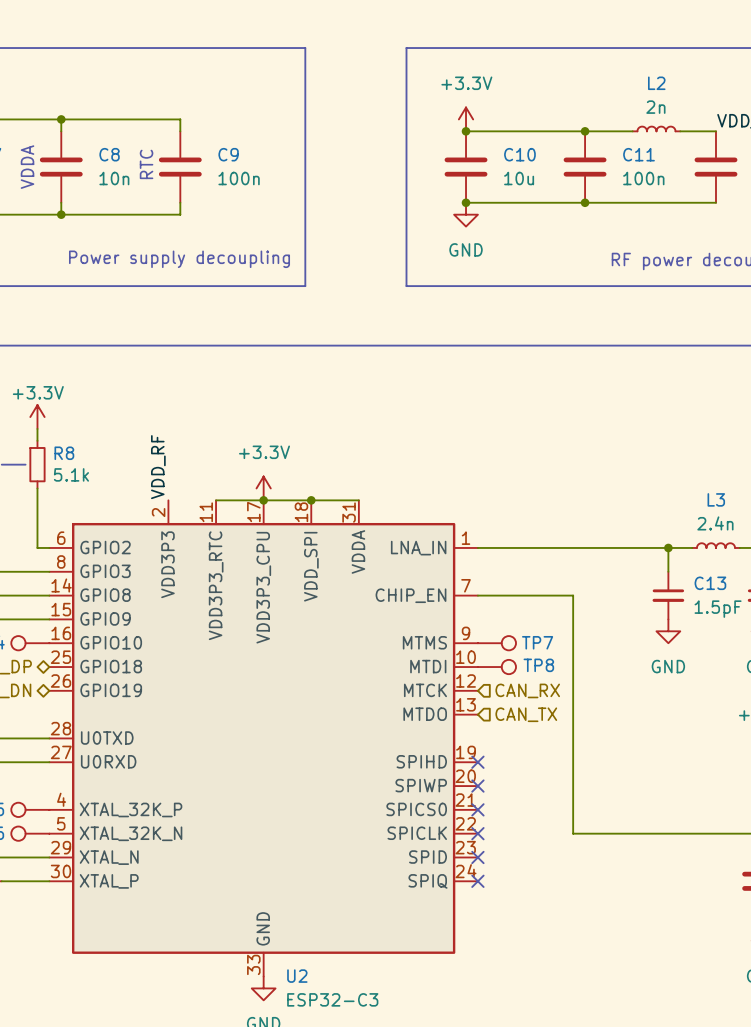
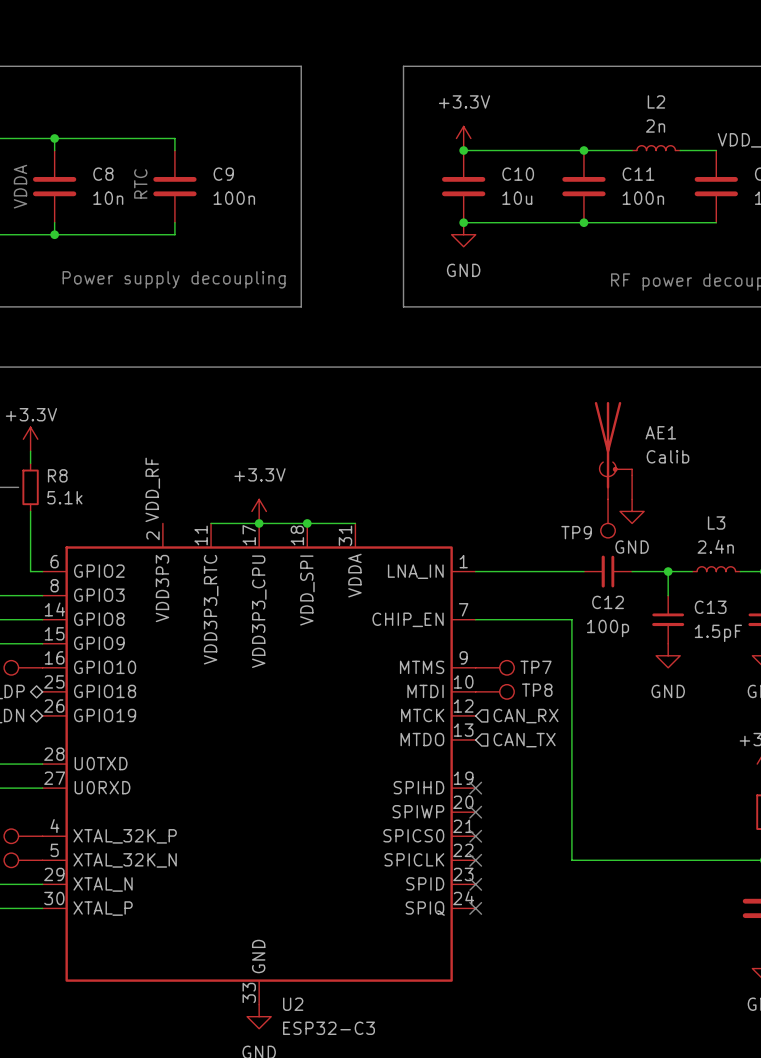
AE1: none -> Calib (613, 450)
power symbol: none -> GND (632, 511)
TP9: none -> (608, 518)
C12: none -> 100p (608, 571)

